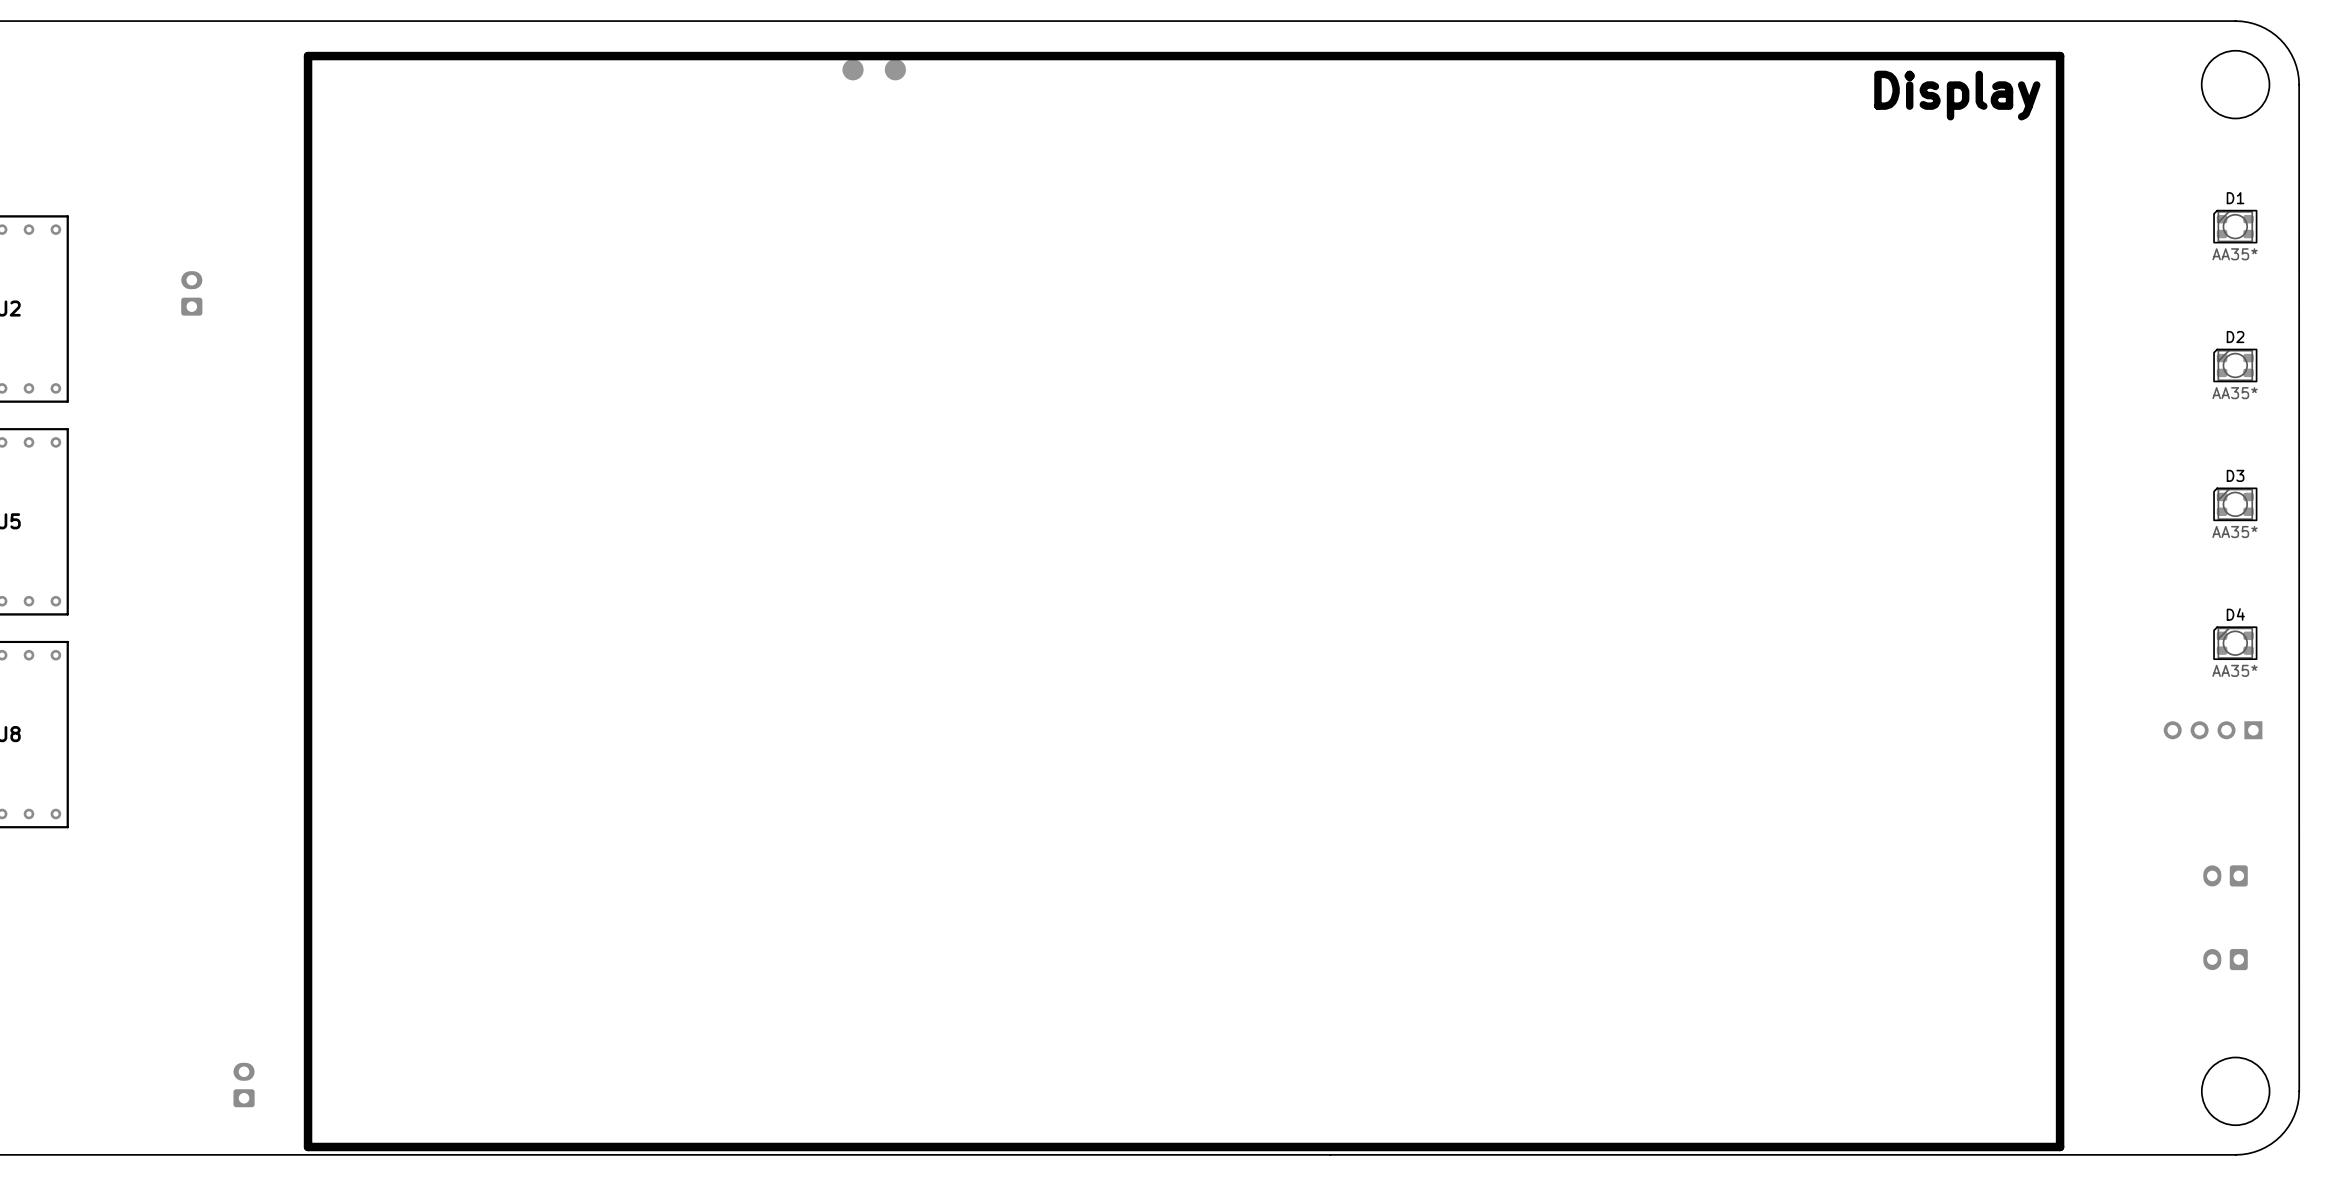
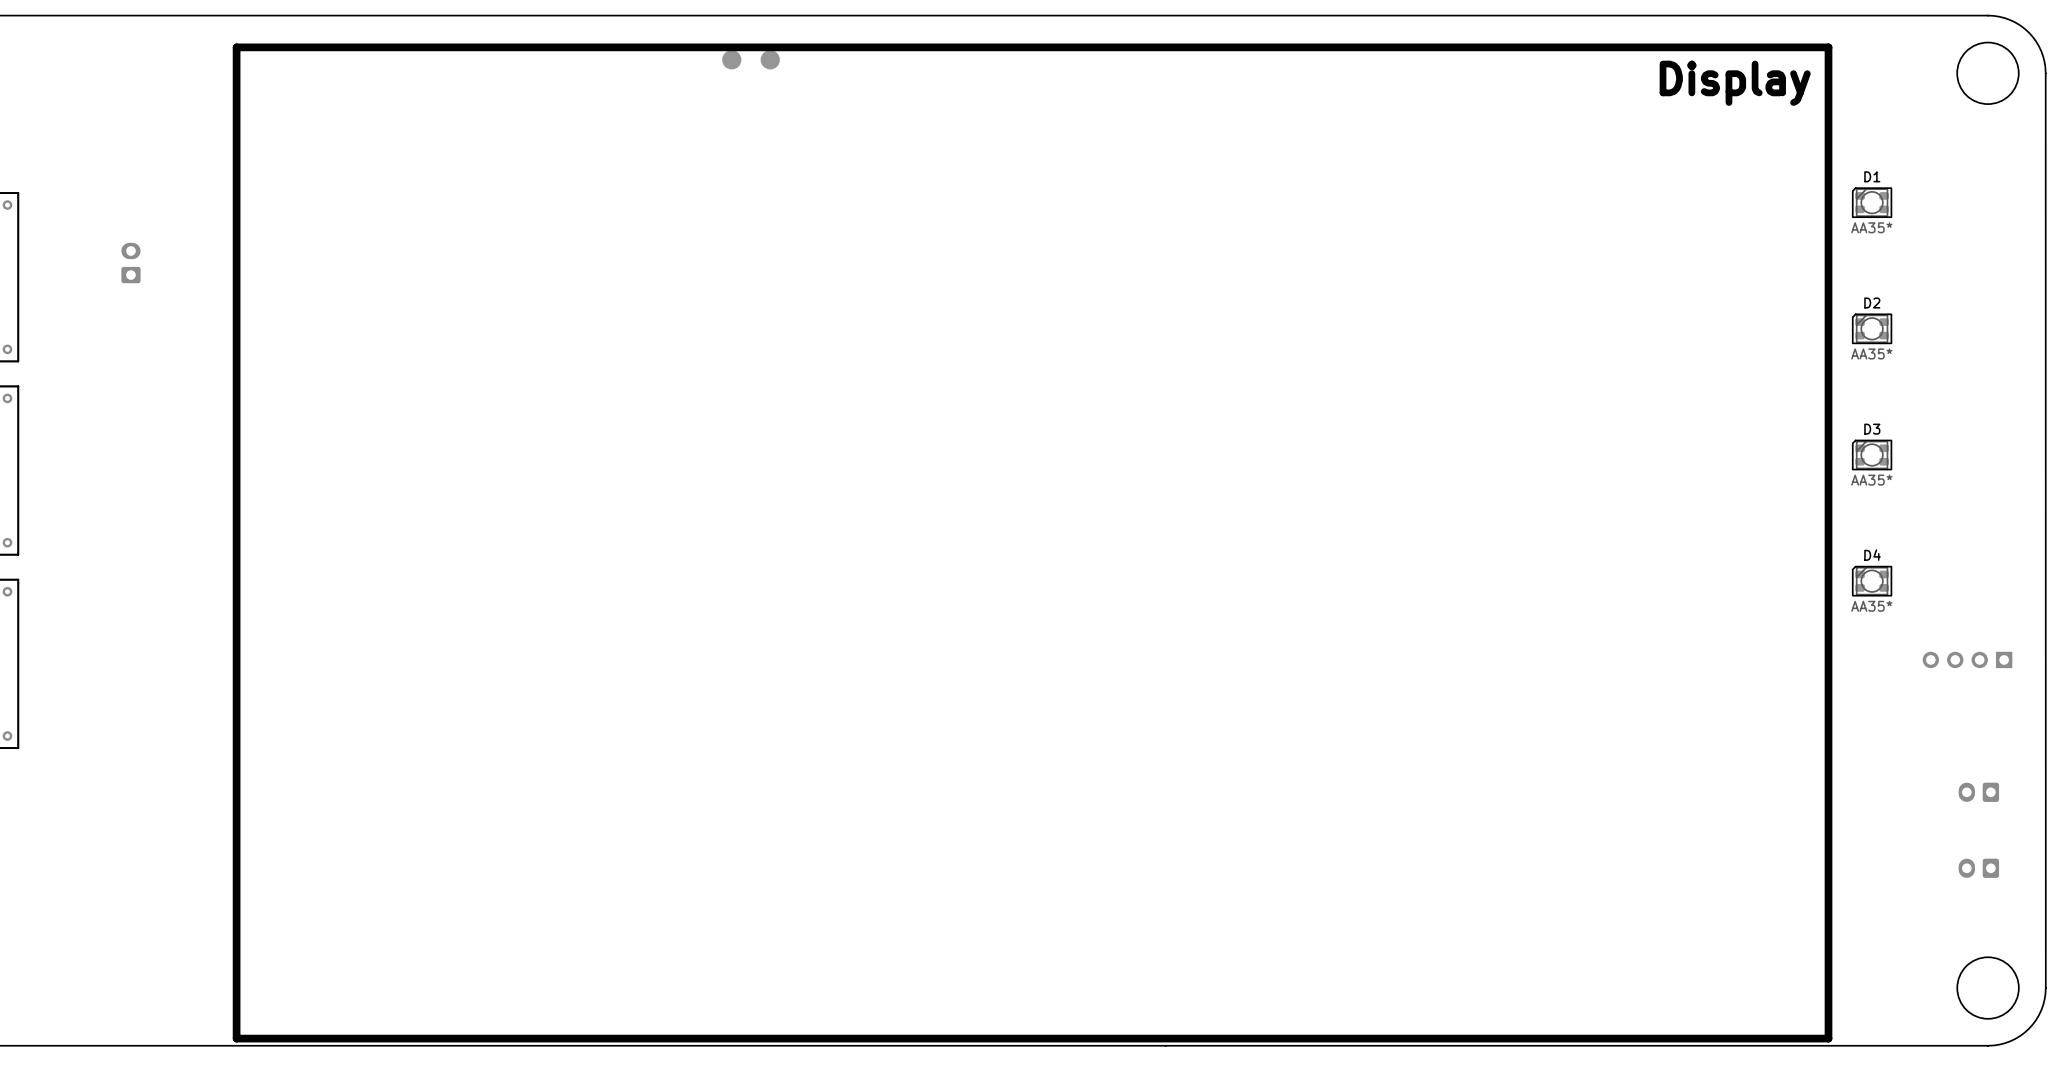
D1 position: (2235, 226) -> (1872, 202)
D2 position: (2235, 365) -> (1872, 328)
D3 position: (2235, 504) -> (1872, 455)
D4 position: (2235, 643) -> (1872, 581)
part: (244, 1085) -> none

